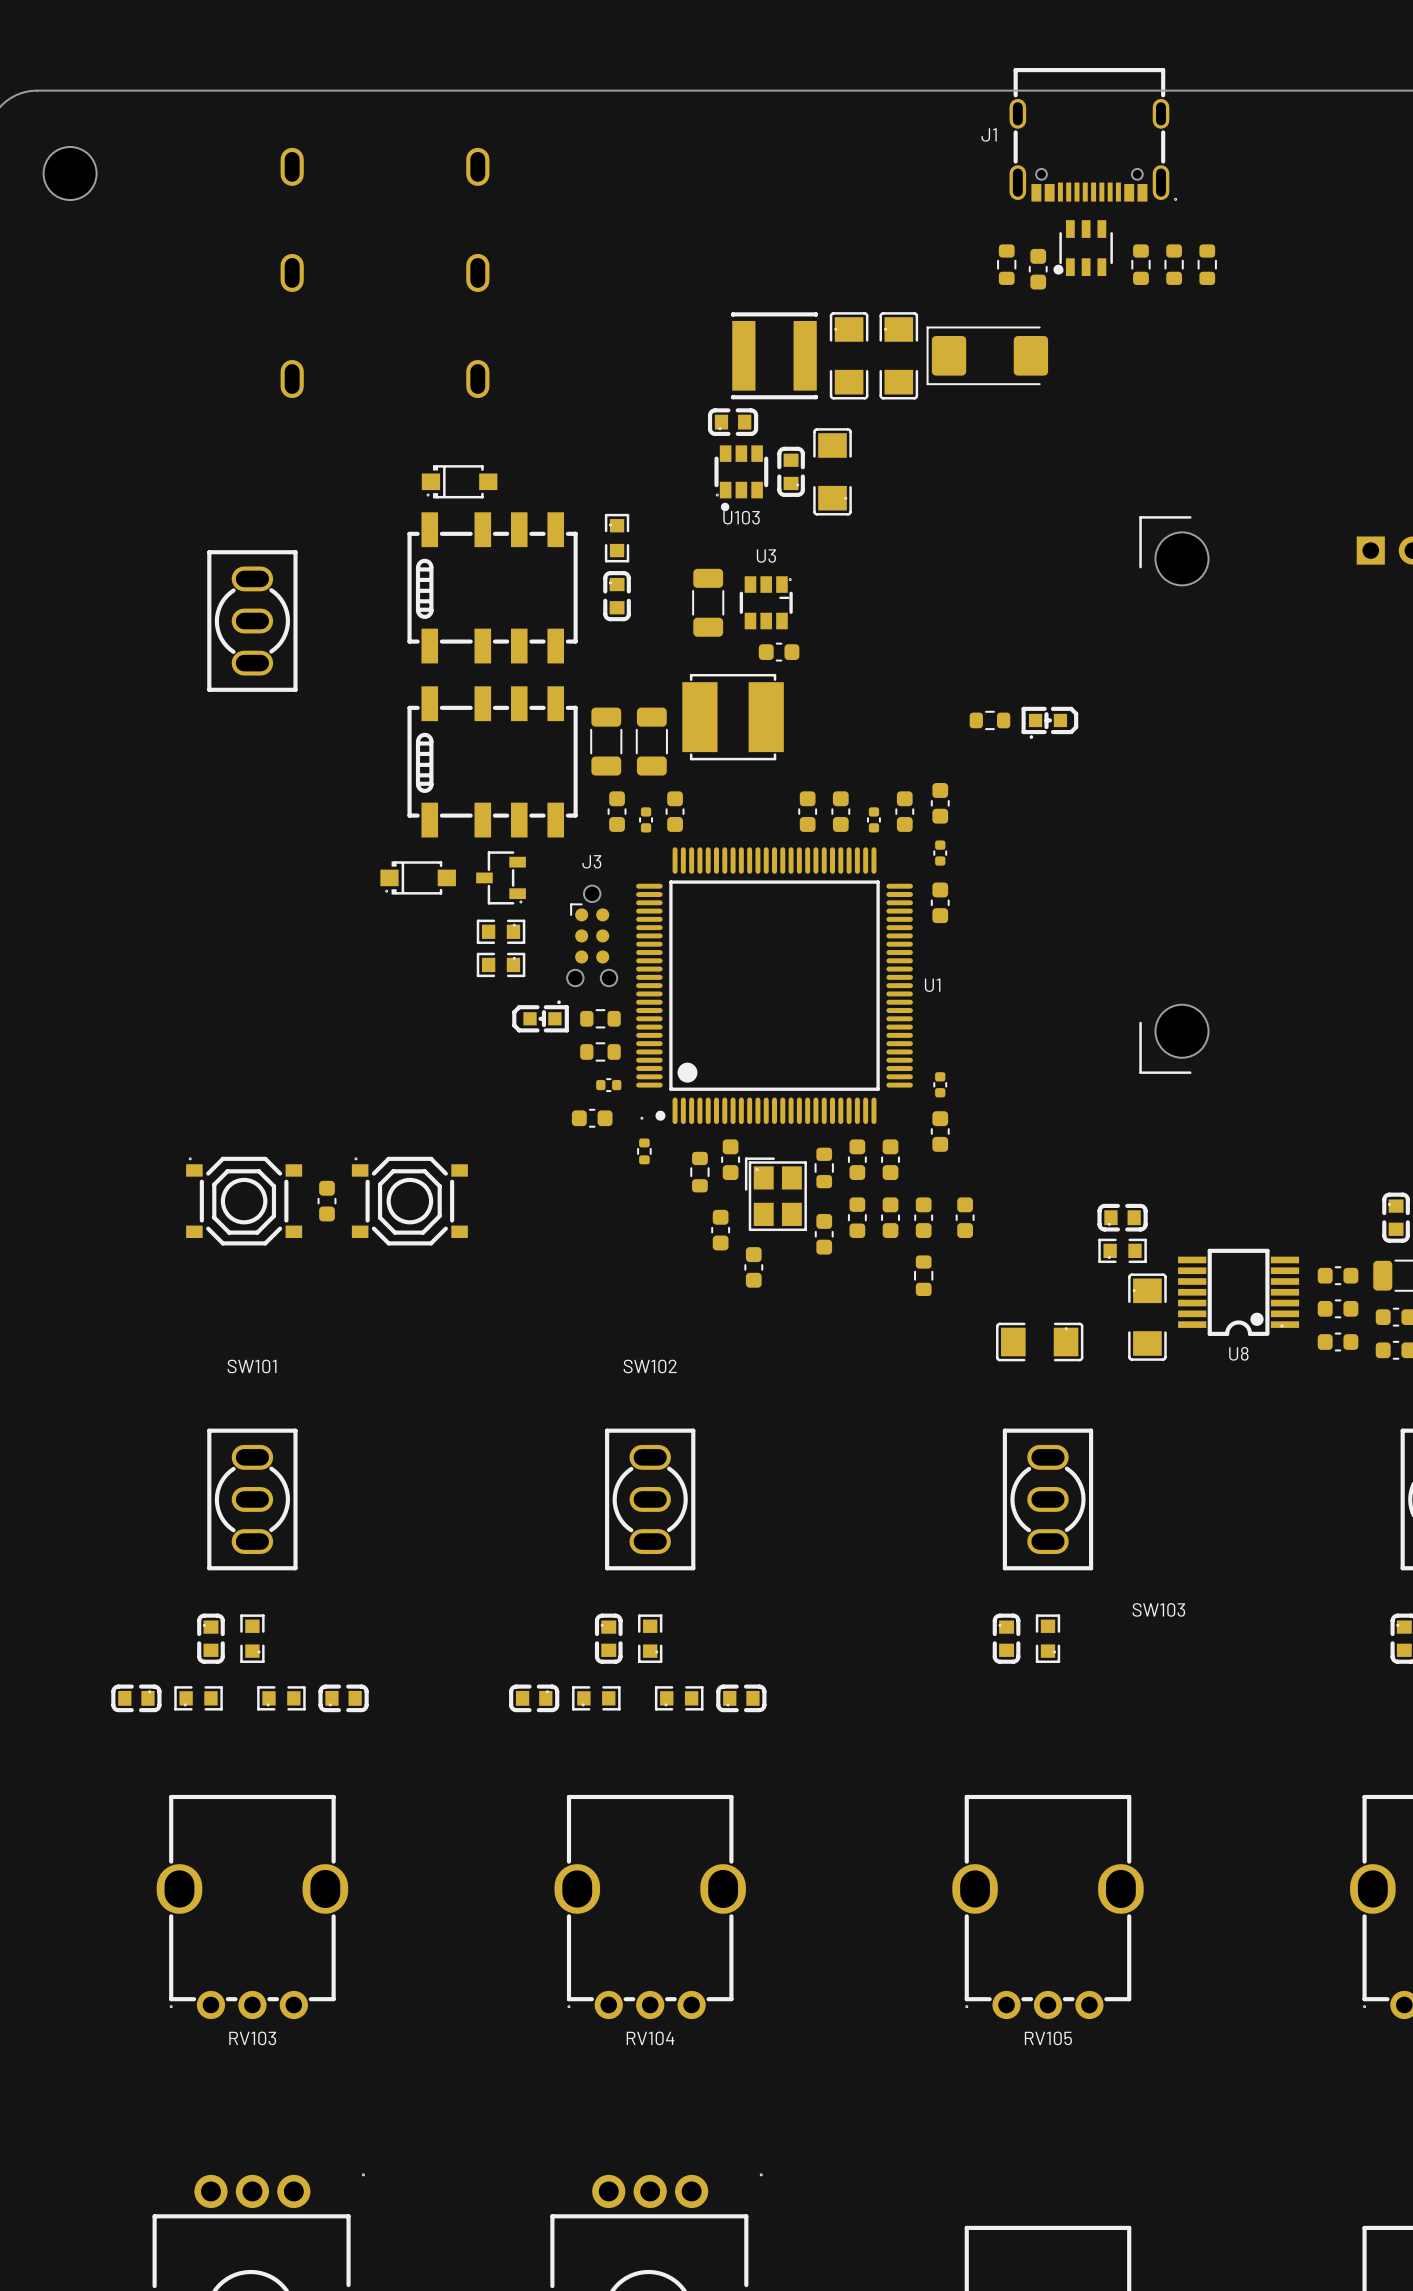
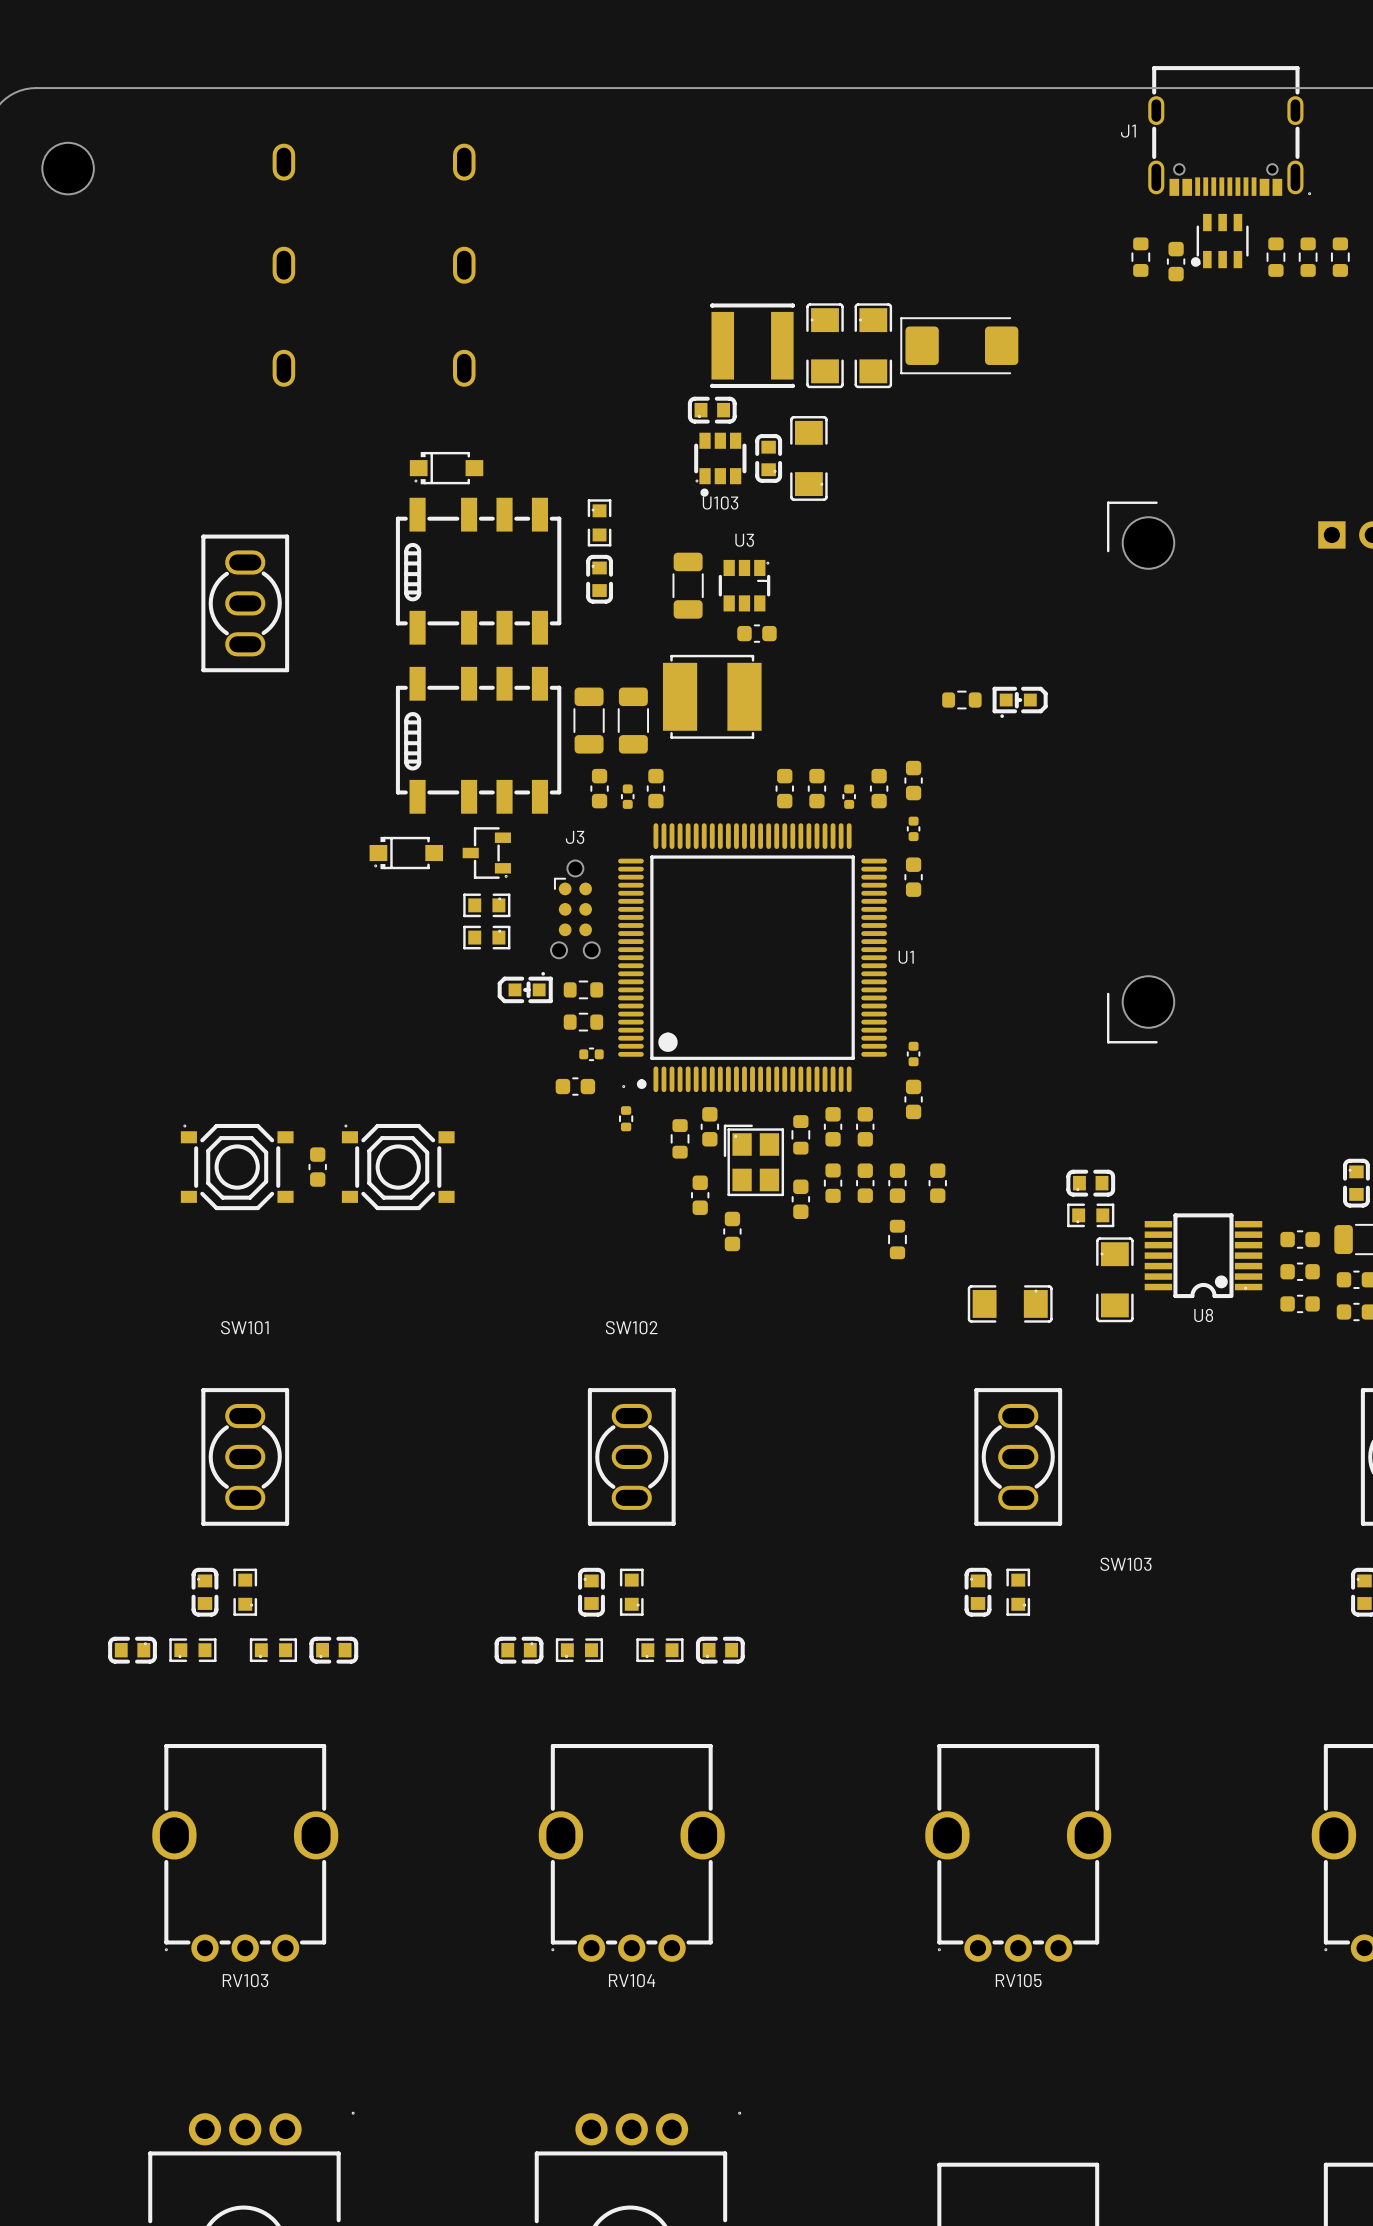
J1 position: (1093, 134) -> (1229, 130)
part footprint: [1197, 244, 1217, 285] -> [1166, 241, 1186, 282]
part position: (1083, 248) -> (1219, 241)
part: (1006, 264) -> none
part: (1140, 264) -> none
part: none -> (1275, 257)
part: none -> (1308, 257)
part: none -> (1340, 257)
part: (1038, 269) -> none

